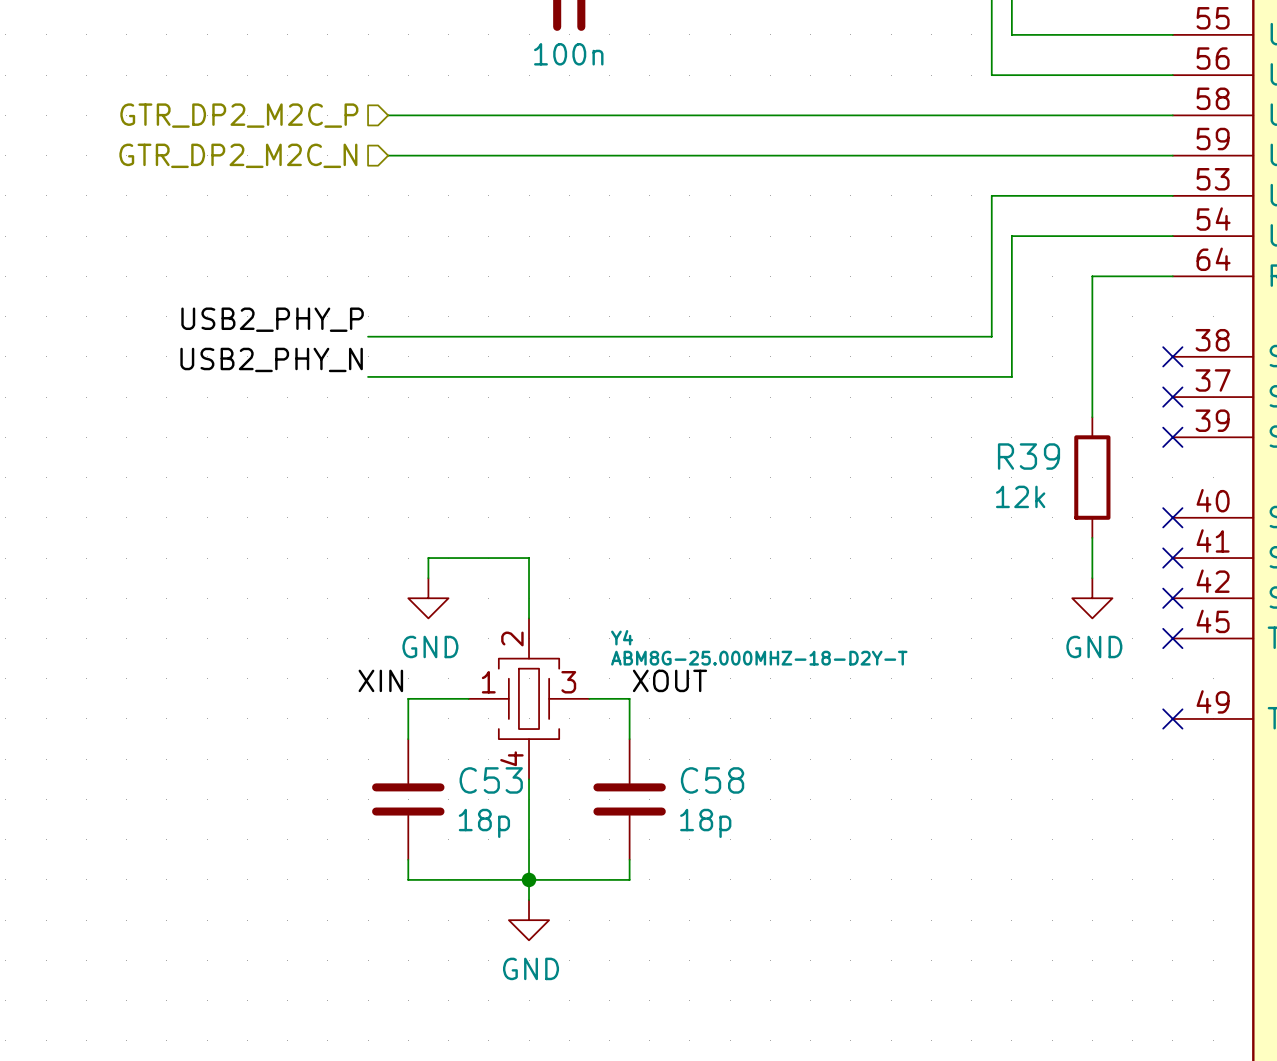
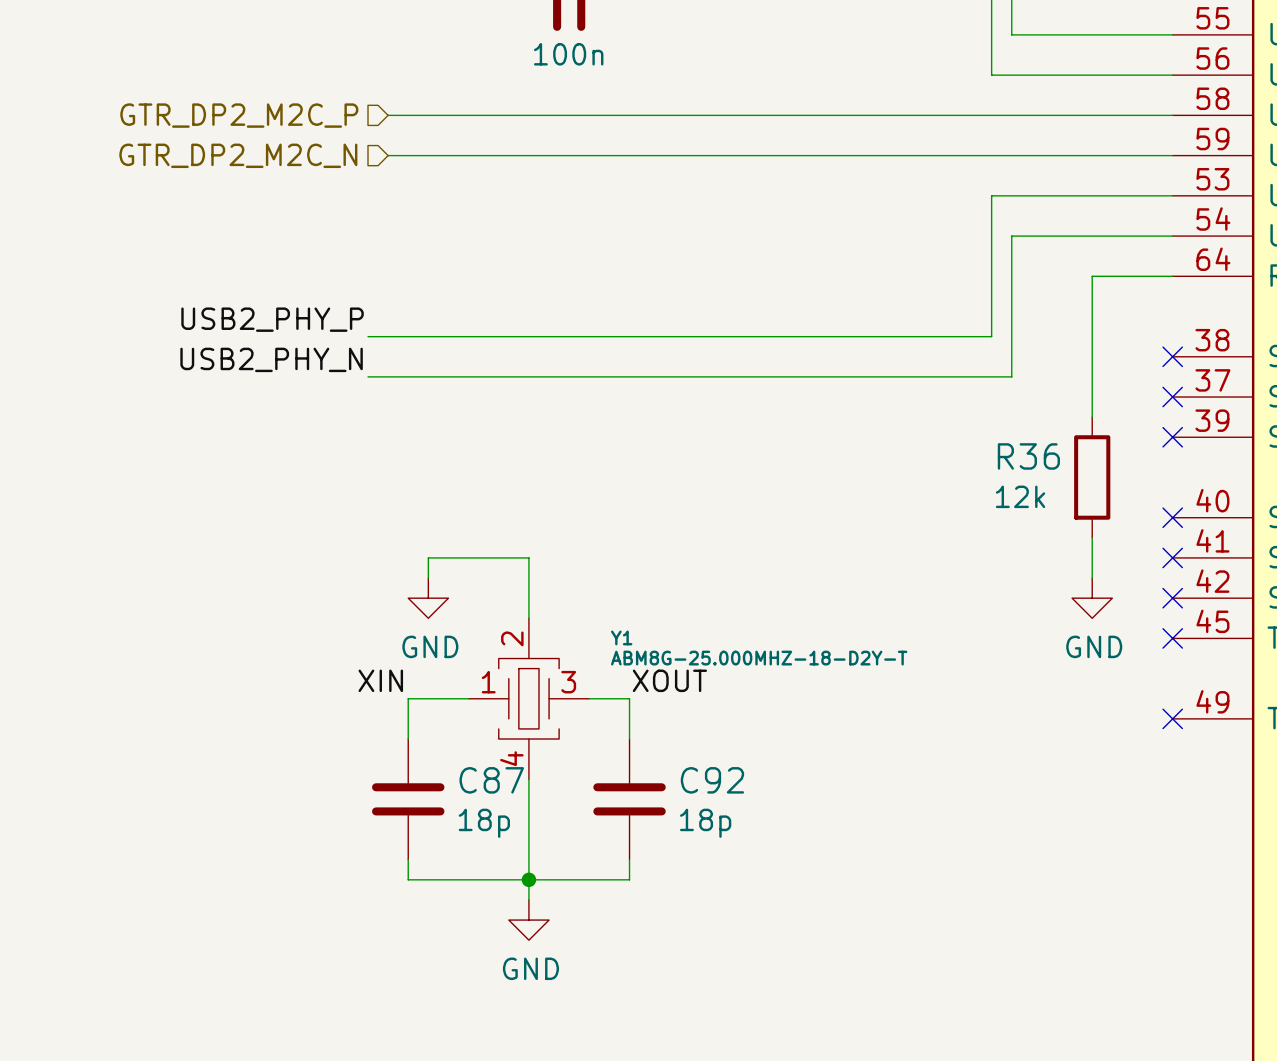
R39 name: R39 (1028, 456) -> R36 (1028, 456)
Y4 name: Y4 (622, 637) -> Y1 (621, 637)
C53 name: C53 (491, 780) -> C87 (491, 780)
C58 name: C58 (712, 780) -> C92 (712, 780)

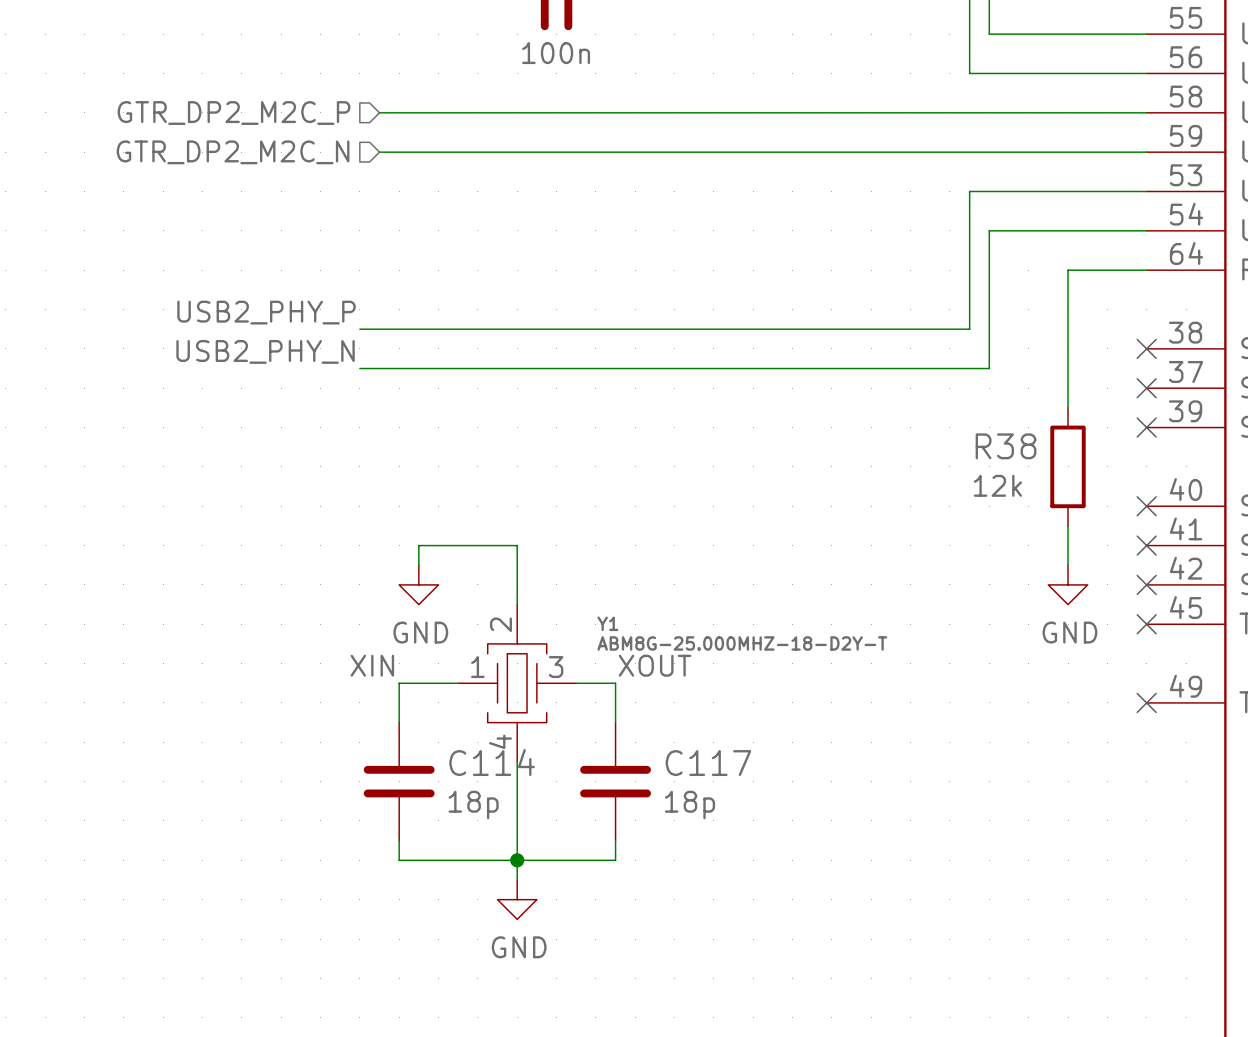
R36 name: R36 (1028, 456) -> R38 (1006, 446)
C87 name: C87 (491, 780) -> C114 (492, 762)
C92 name: C92 (712, 780) -> C117 (708, 763)

